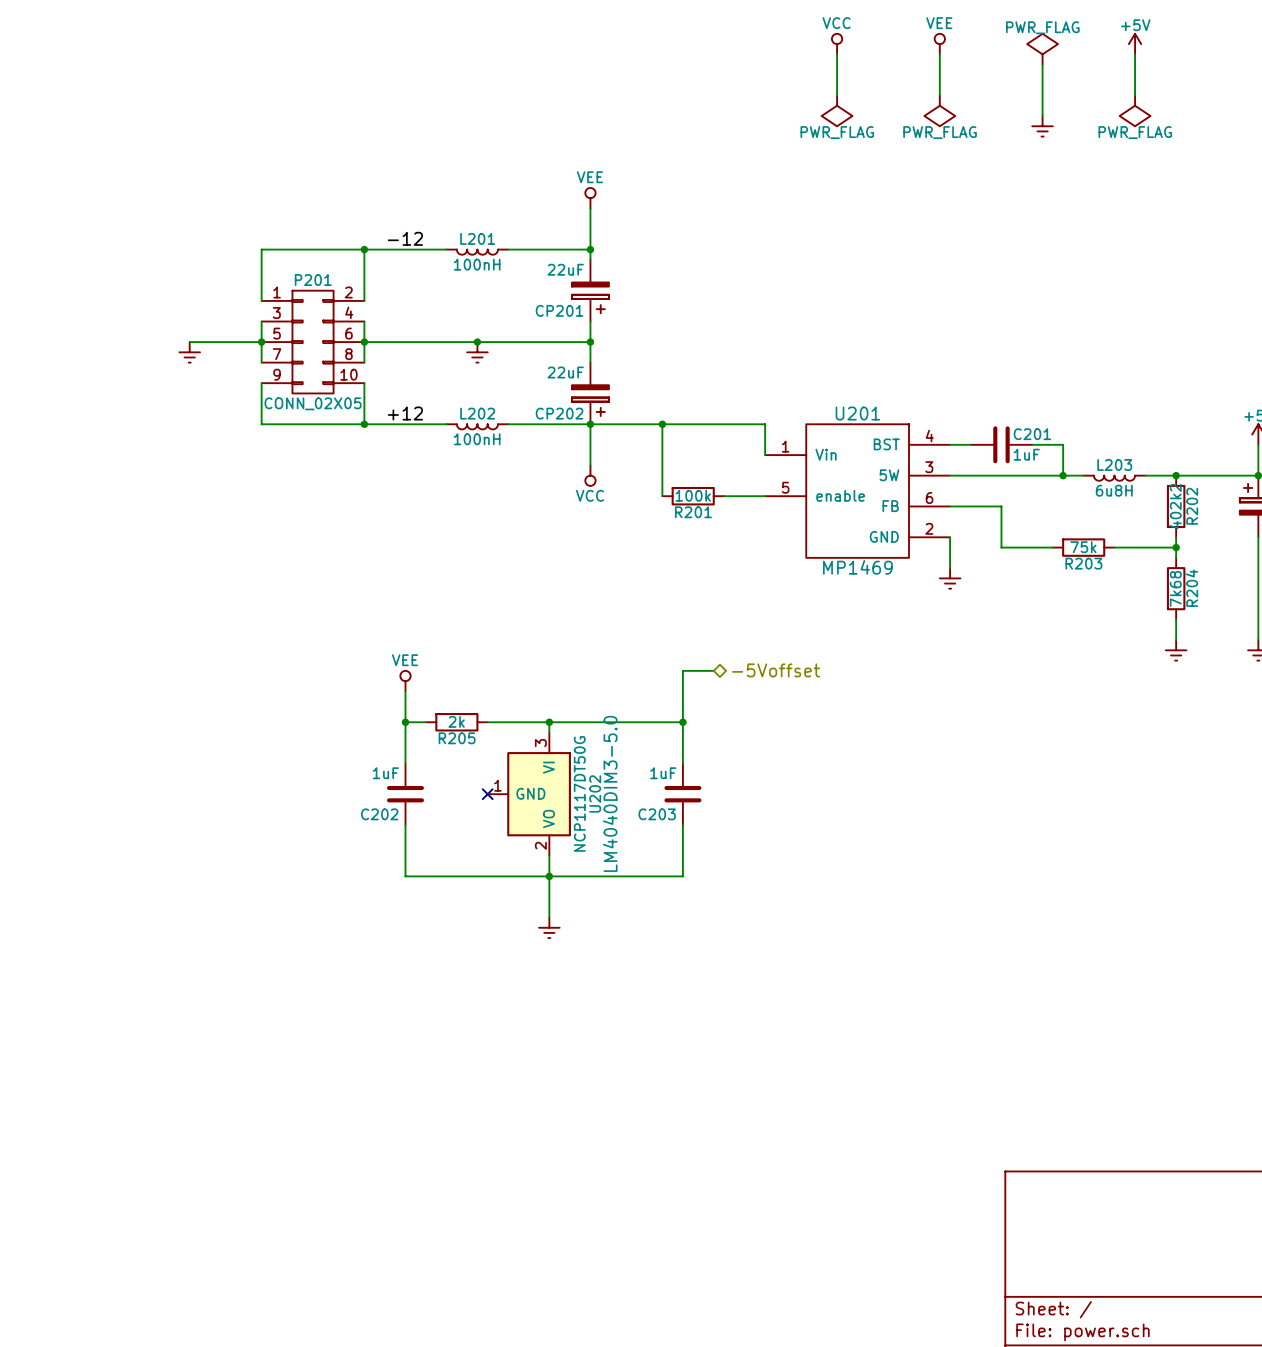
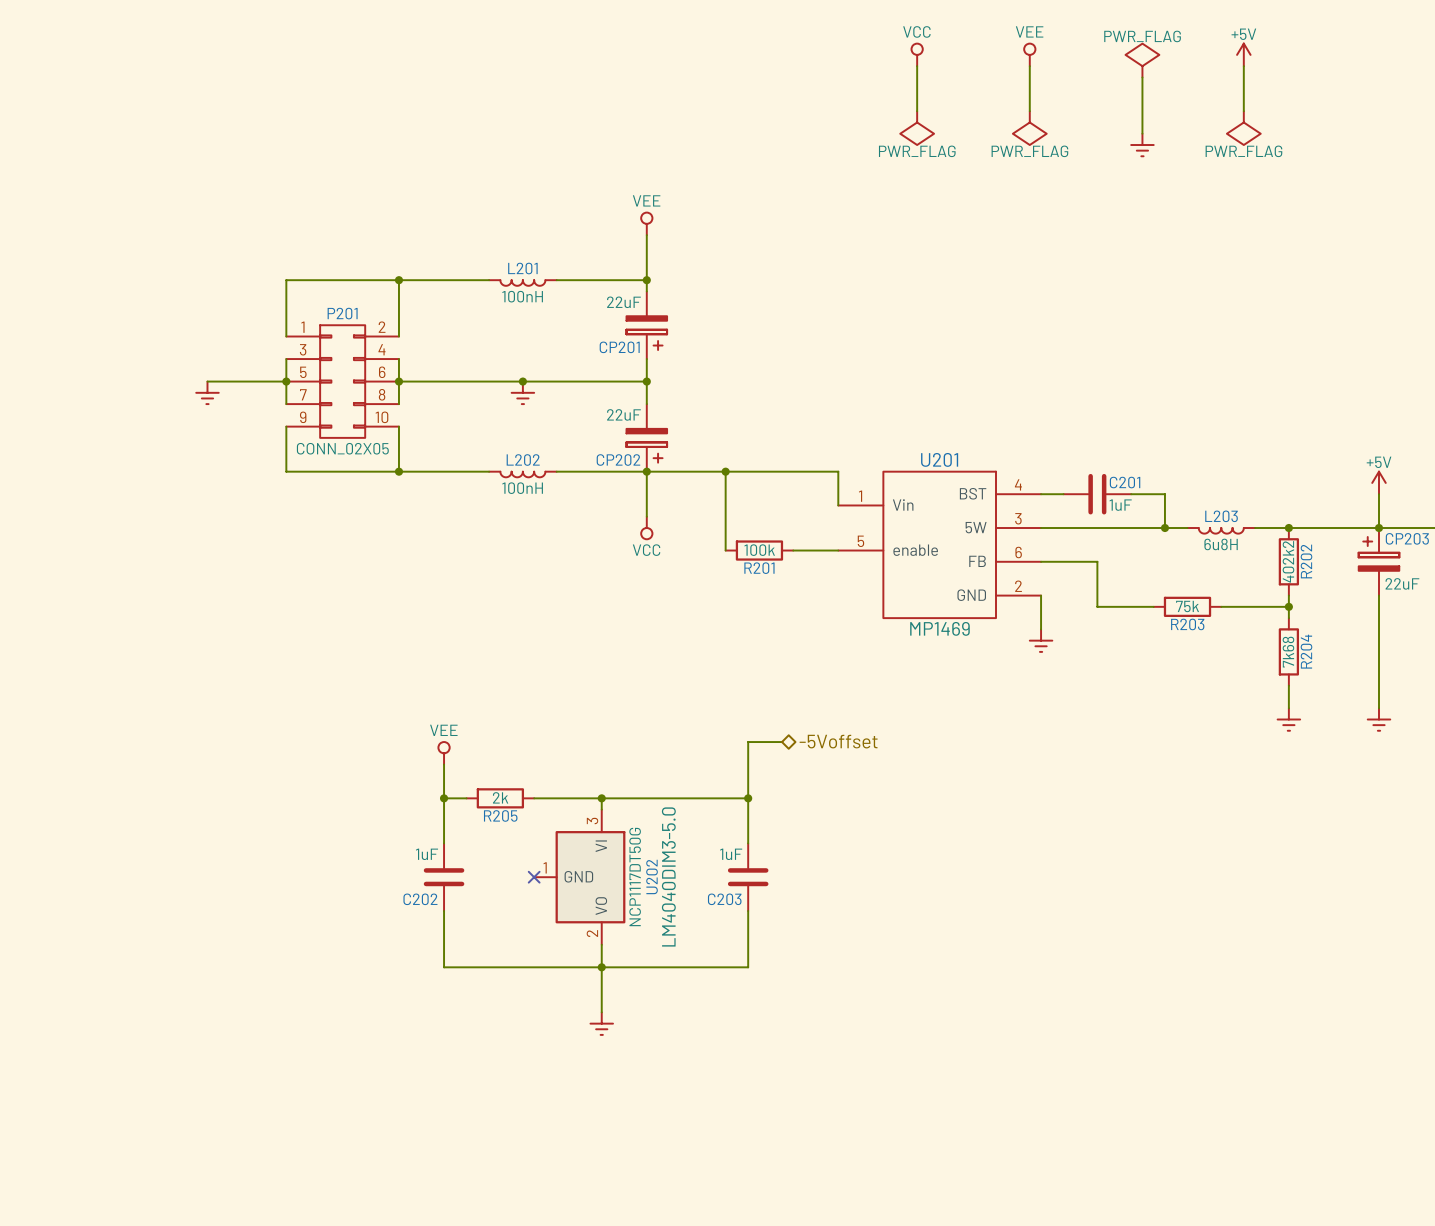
label: -12 (405, 238) -> none
label: +12 (405, 413) -> none

